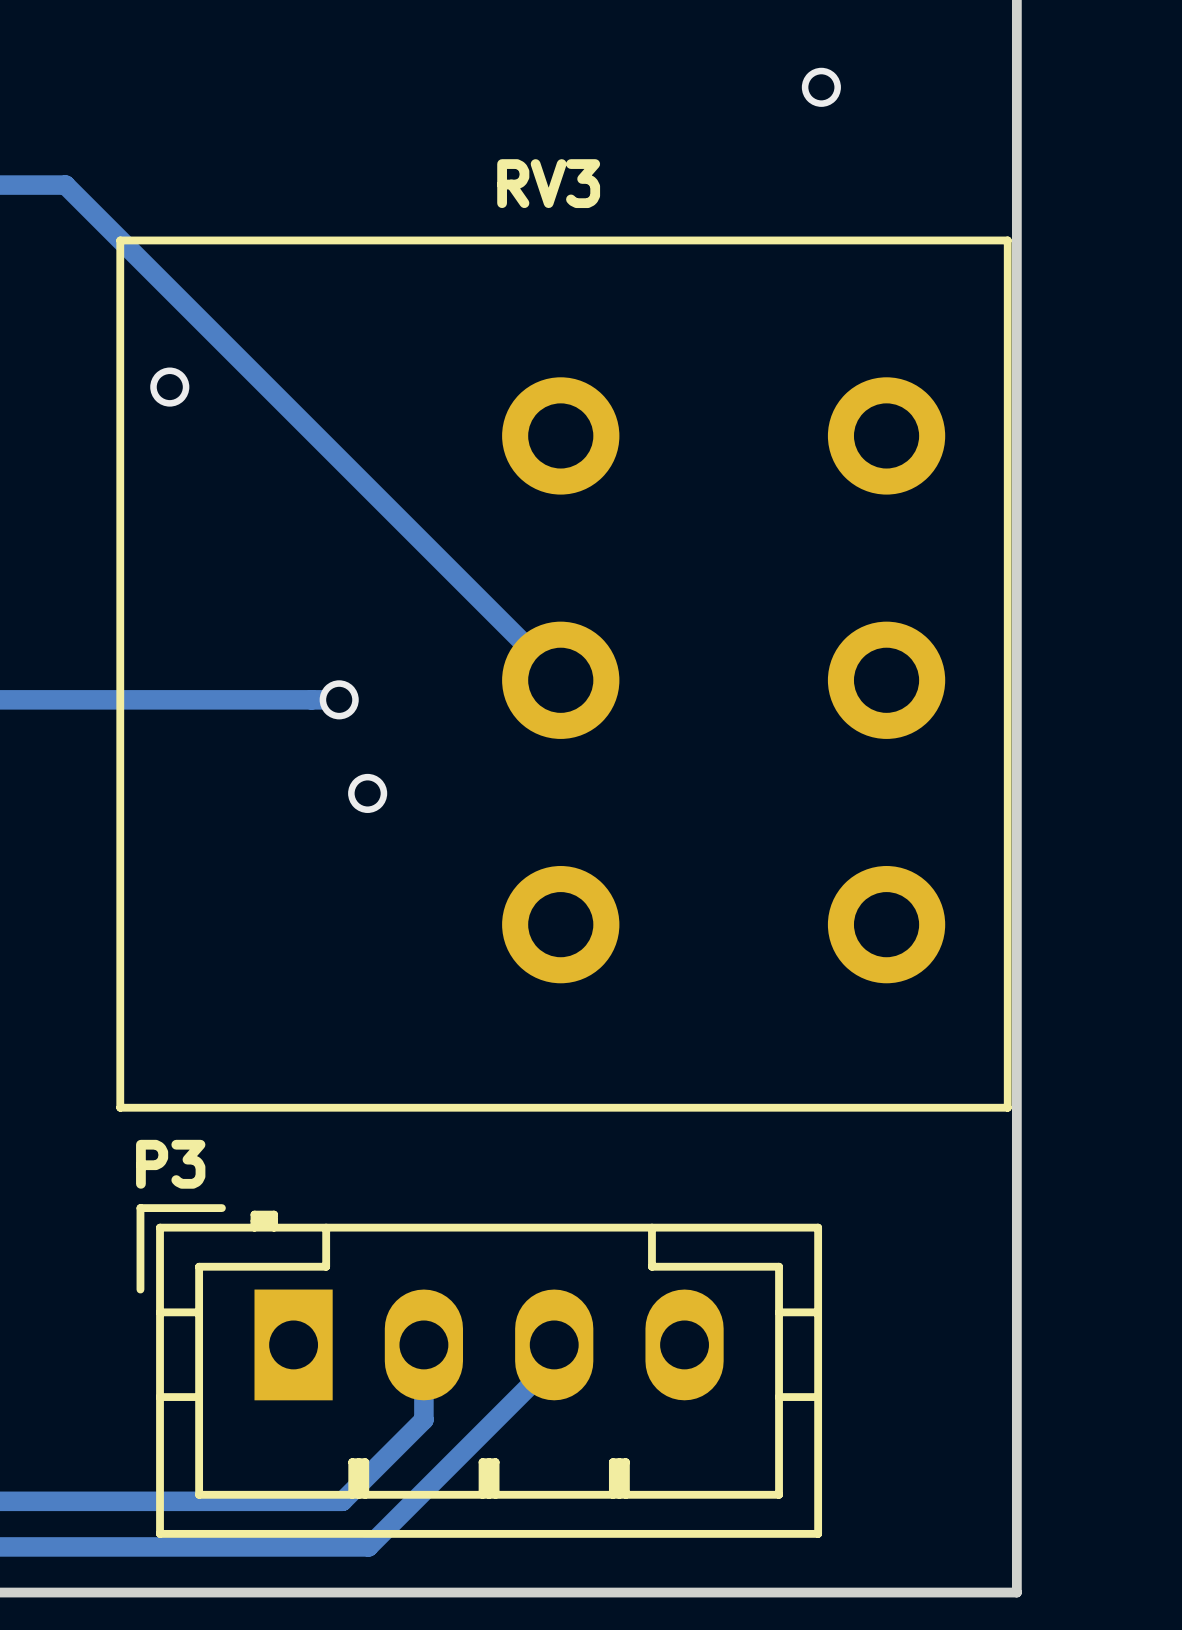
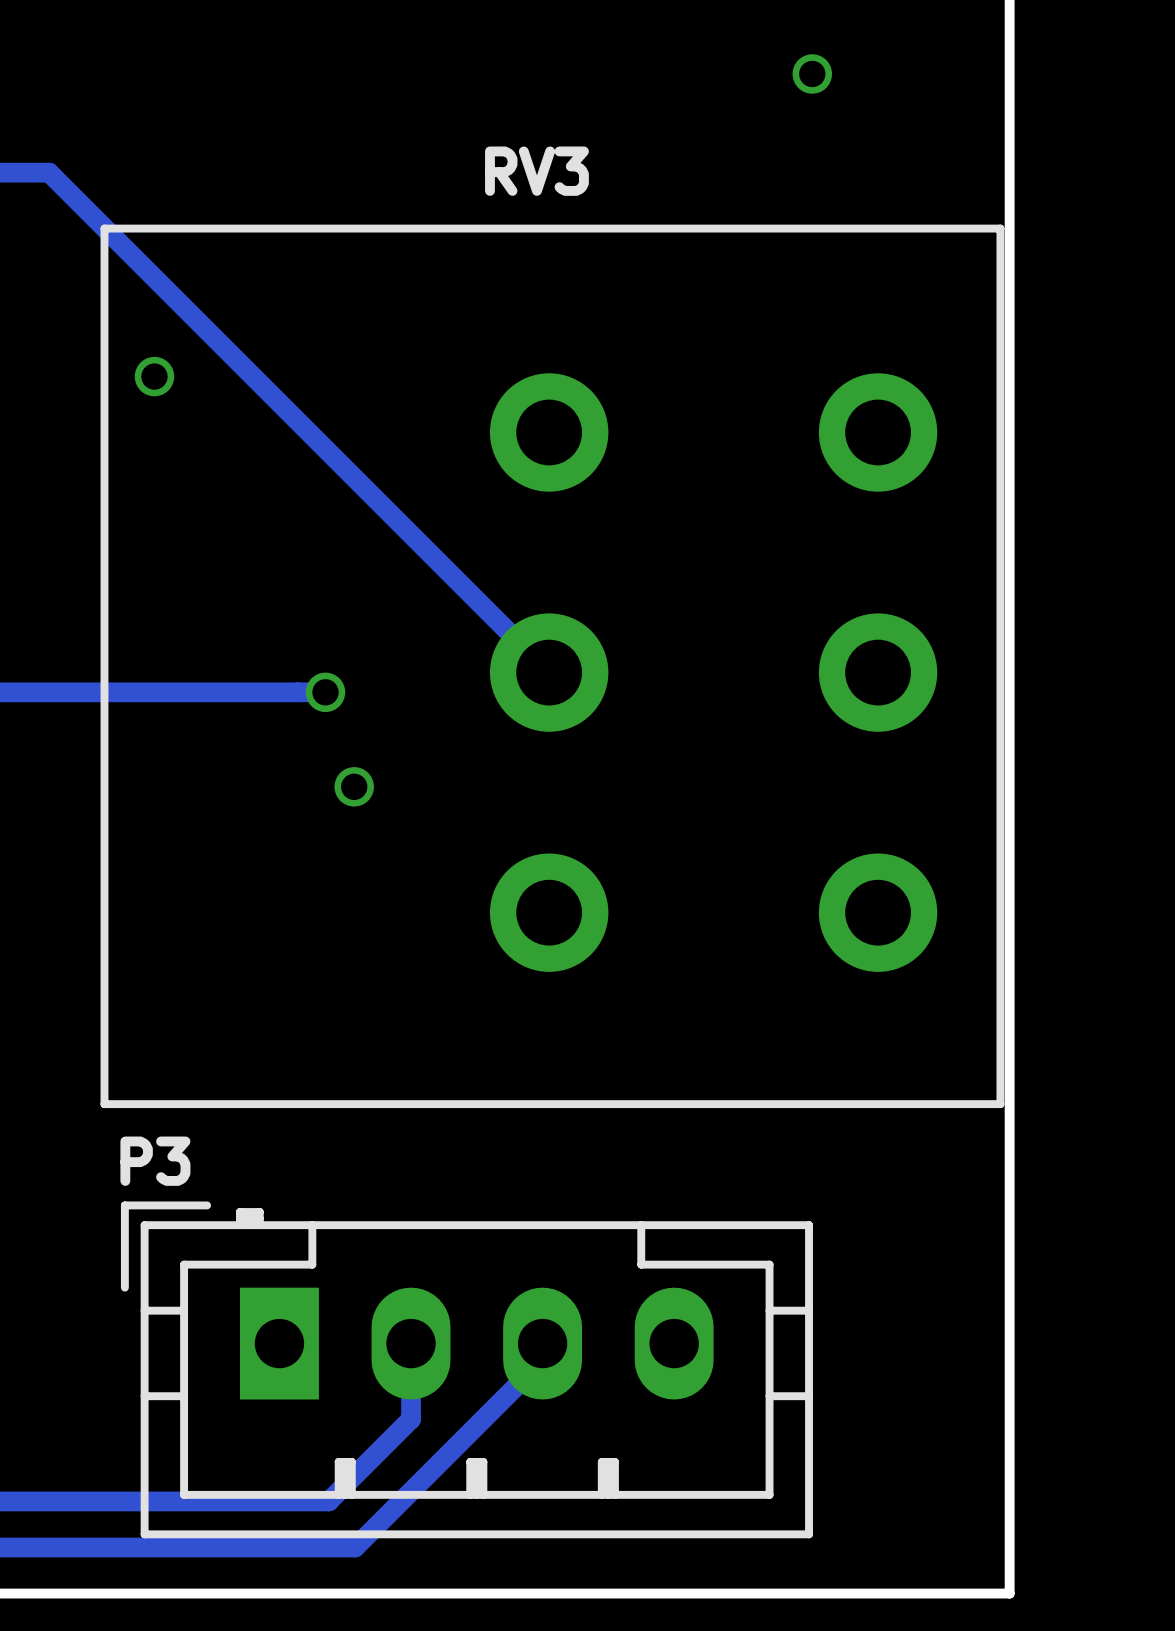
RV3 footprint: [116, 236, 1012, 1112] -> [100, 224, 1005, 1109]

